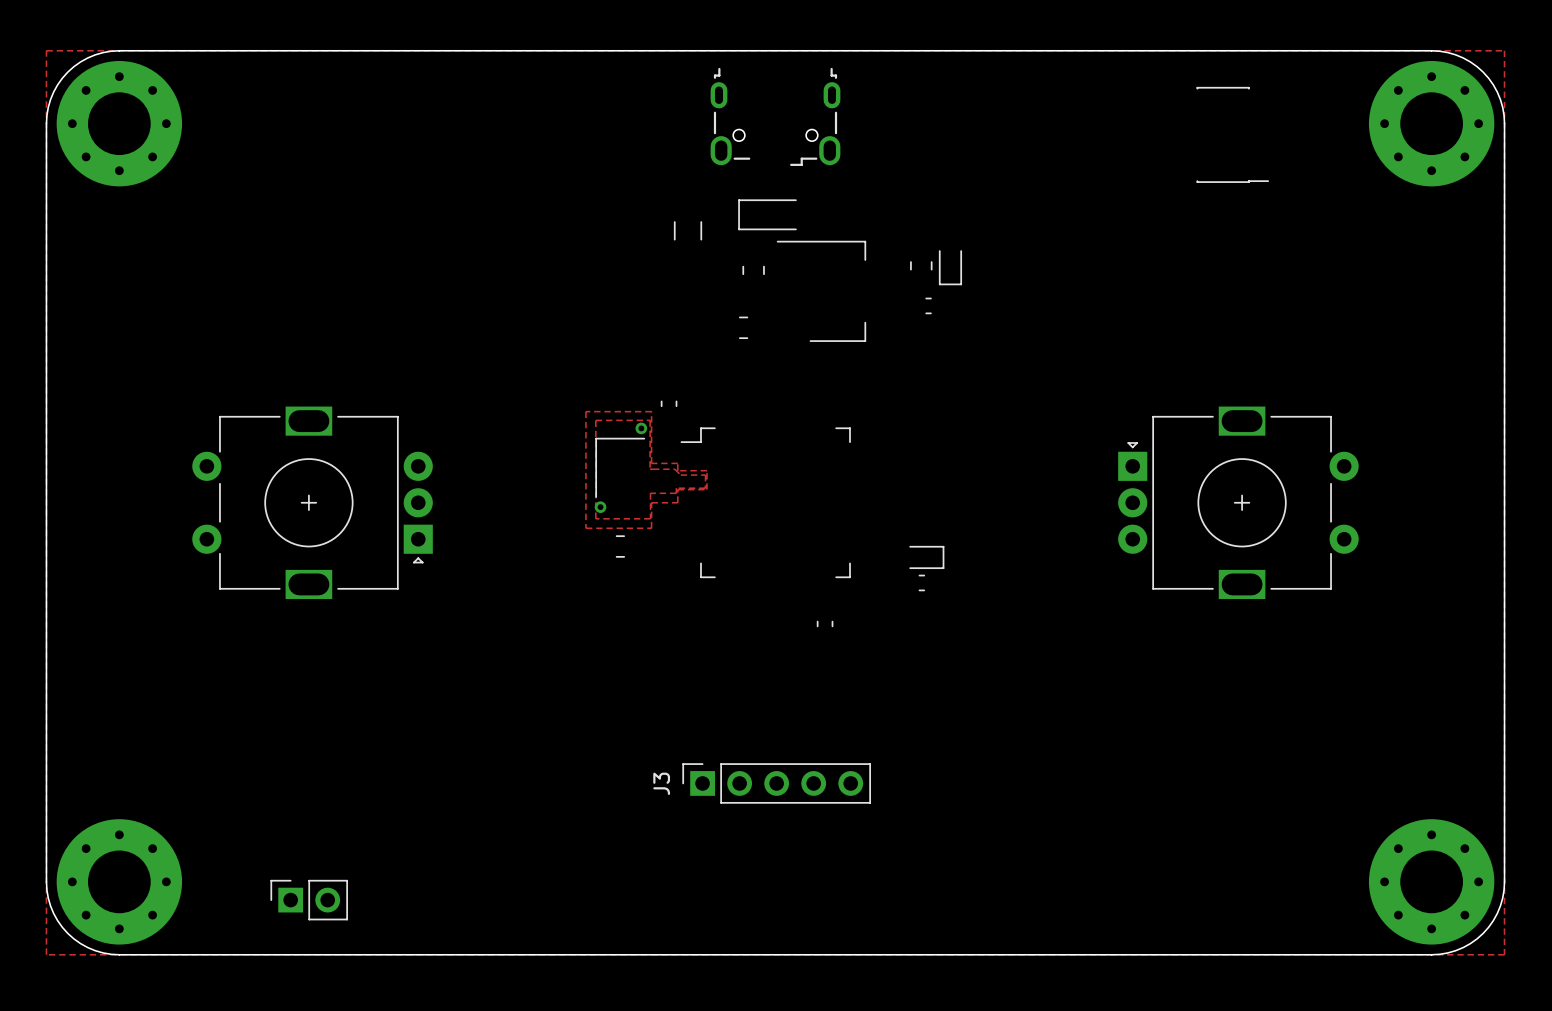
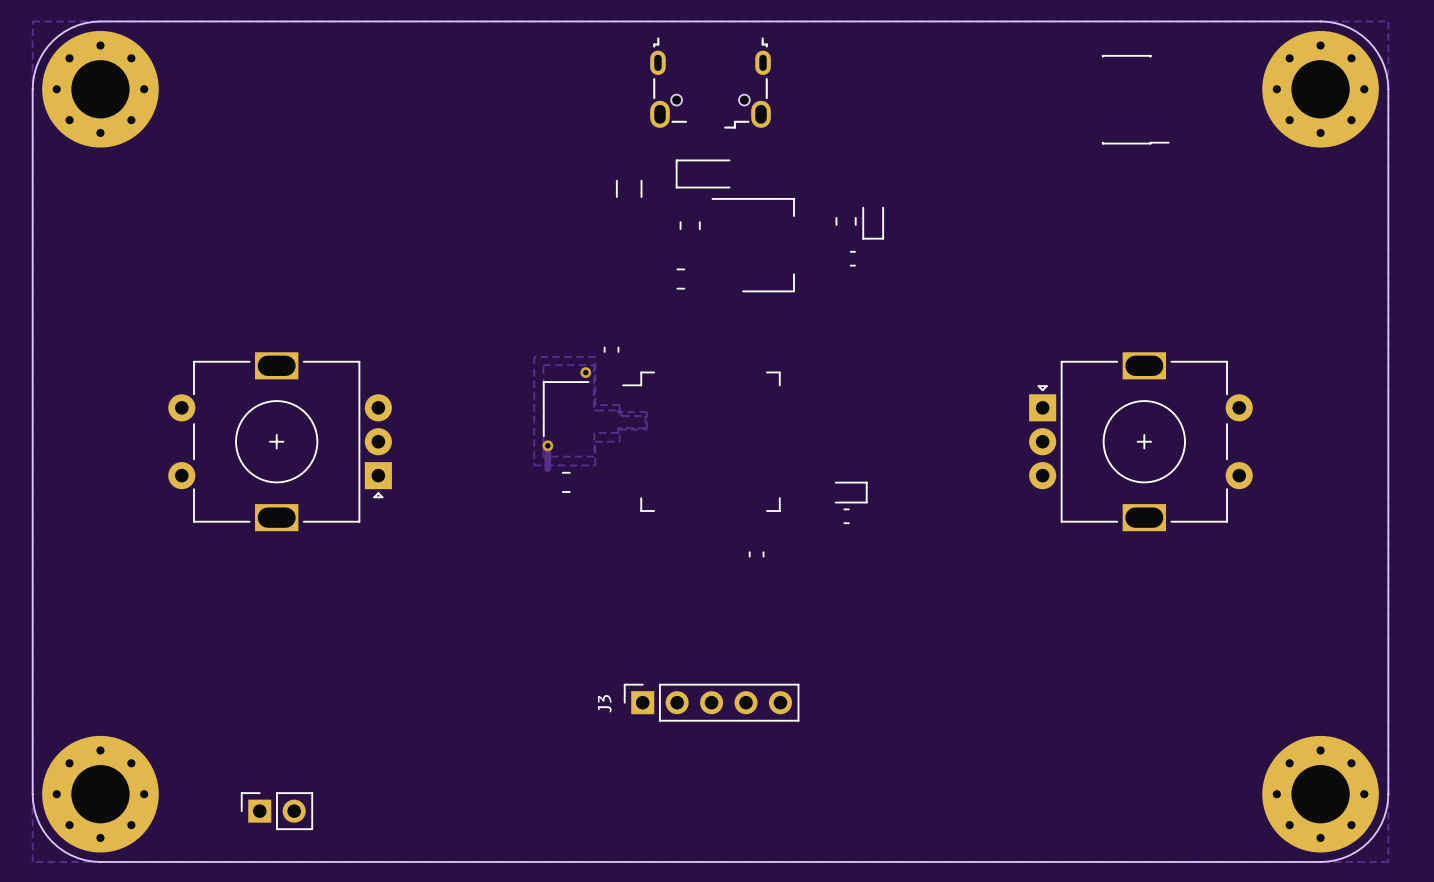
track: none -> (547, 445) (547, 468)

